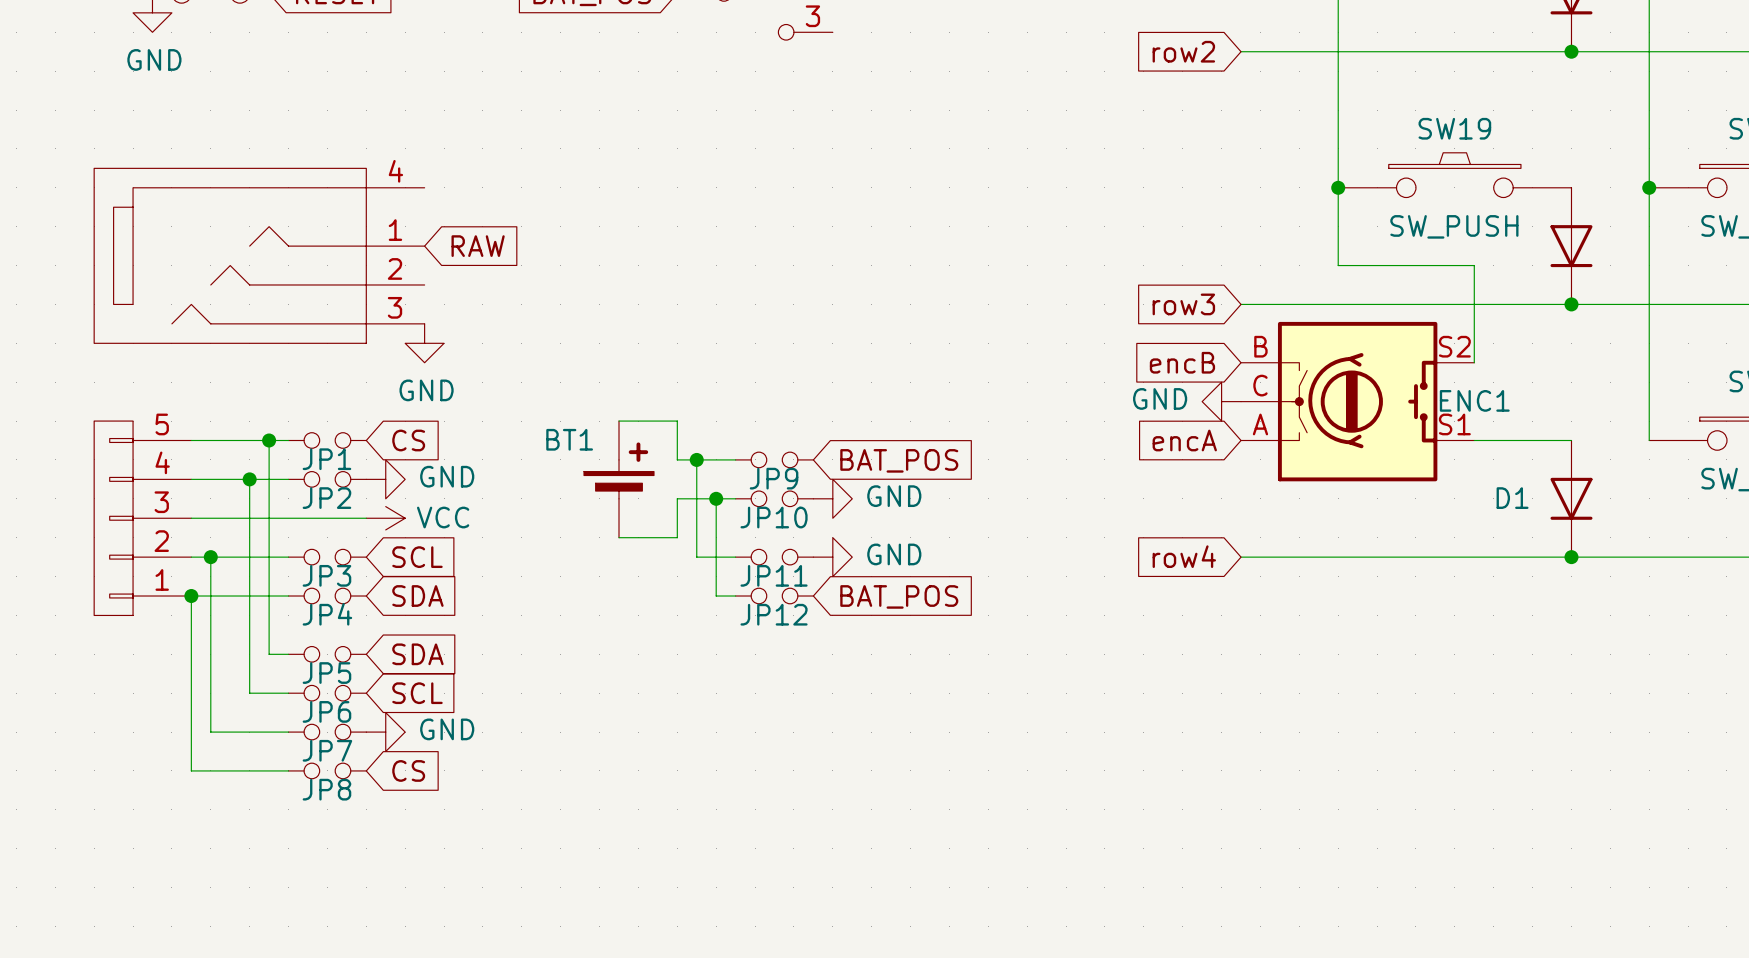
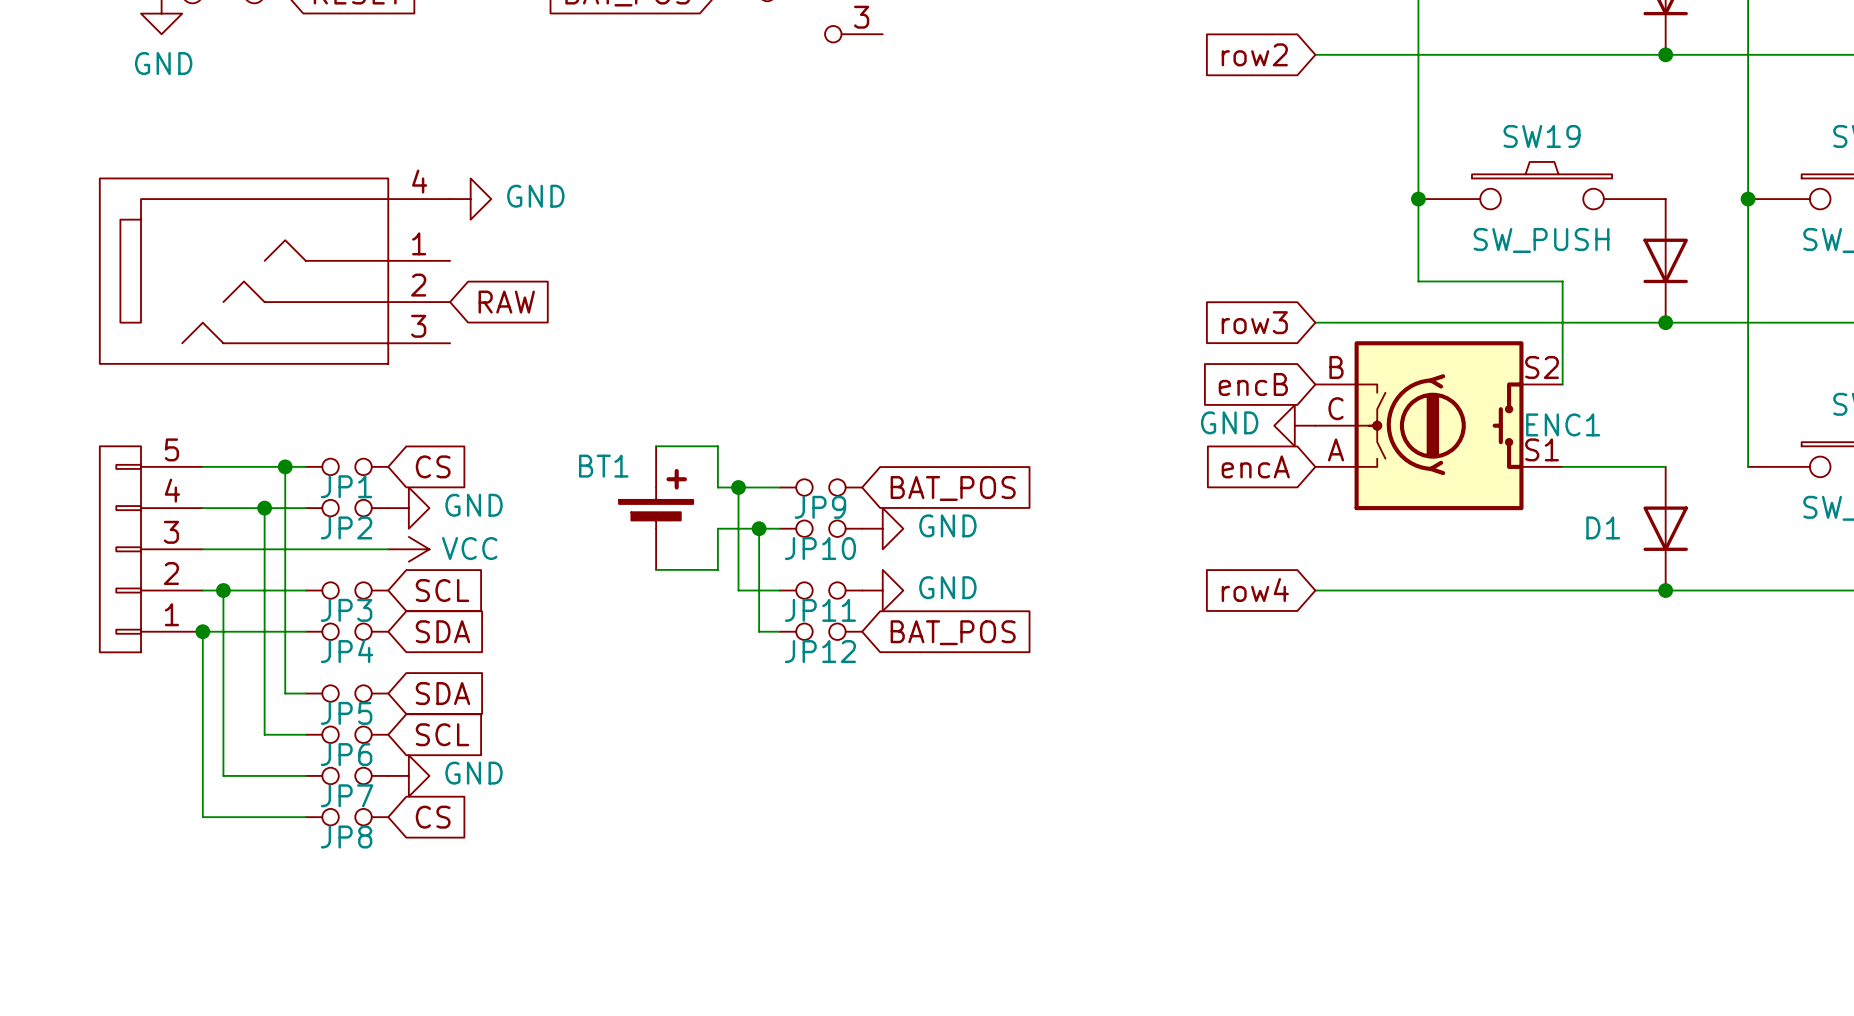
global label position: RAW (478, 246) -> RAW (506, 302)
power symbol rotation: 0° (424, 343) -> 90° counterclockwise (470, 199)
power symbol position: GND (424, 343) -> GND (470, 199)

